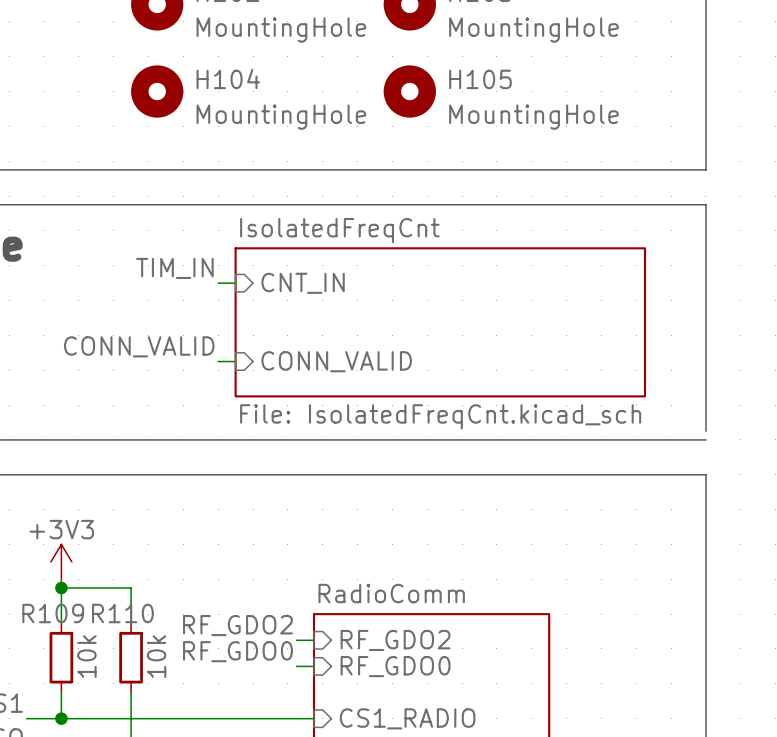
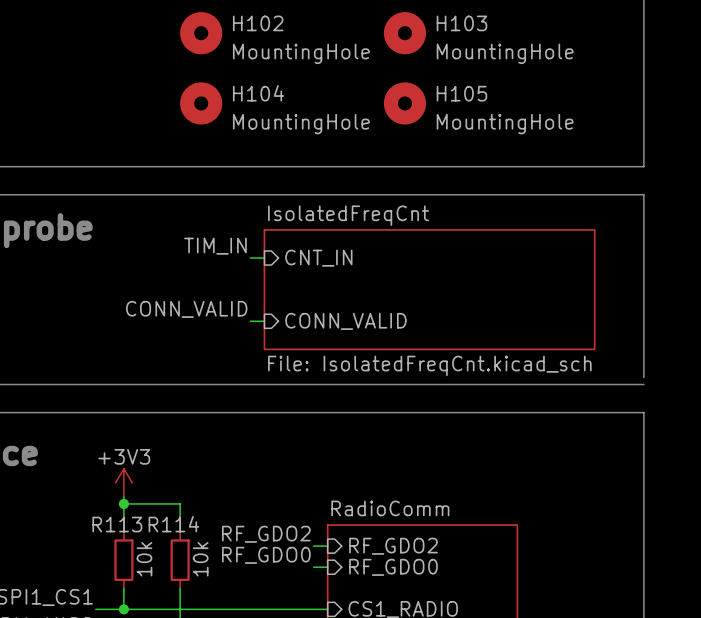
R109 name: R109 (53, 613) -> R113 (117, 524)
R110 name: R110 (122, 613) -> R114 (173, 524)

